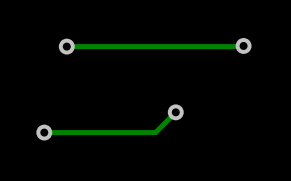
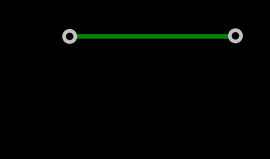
track: (175, 112) (155, 132) (44, 132) -> none
via: (175, 112) -> none
via: (44, 132) -> none

